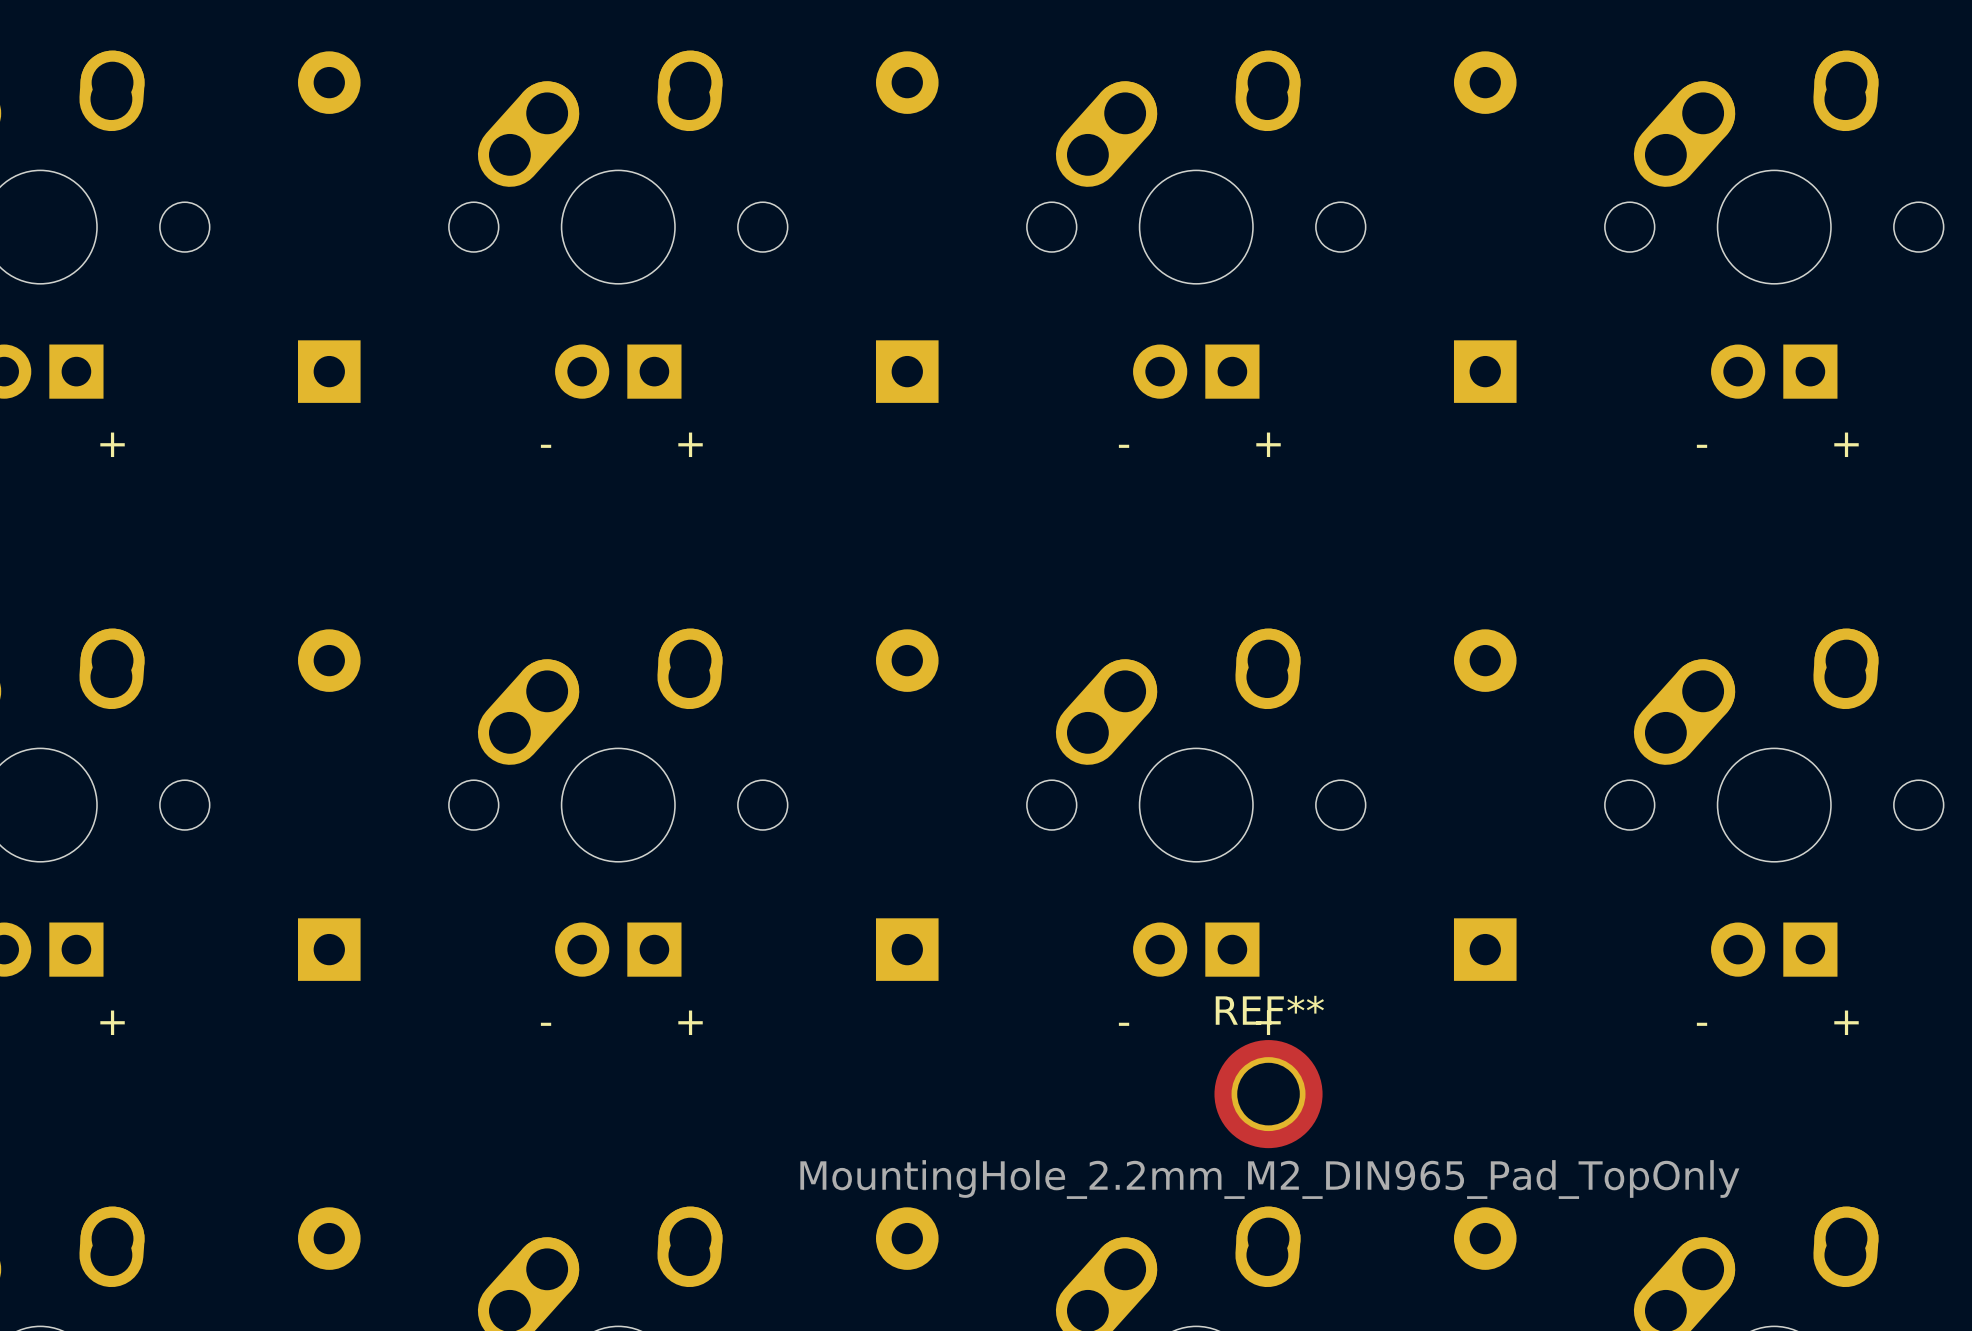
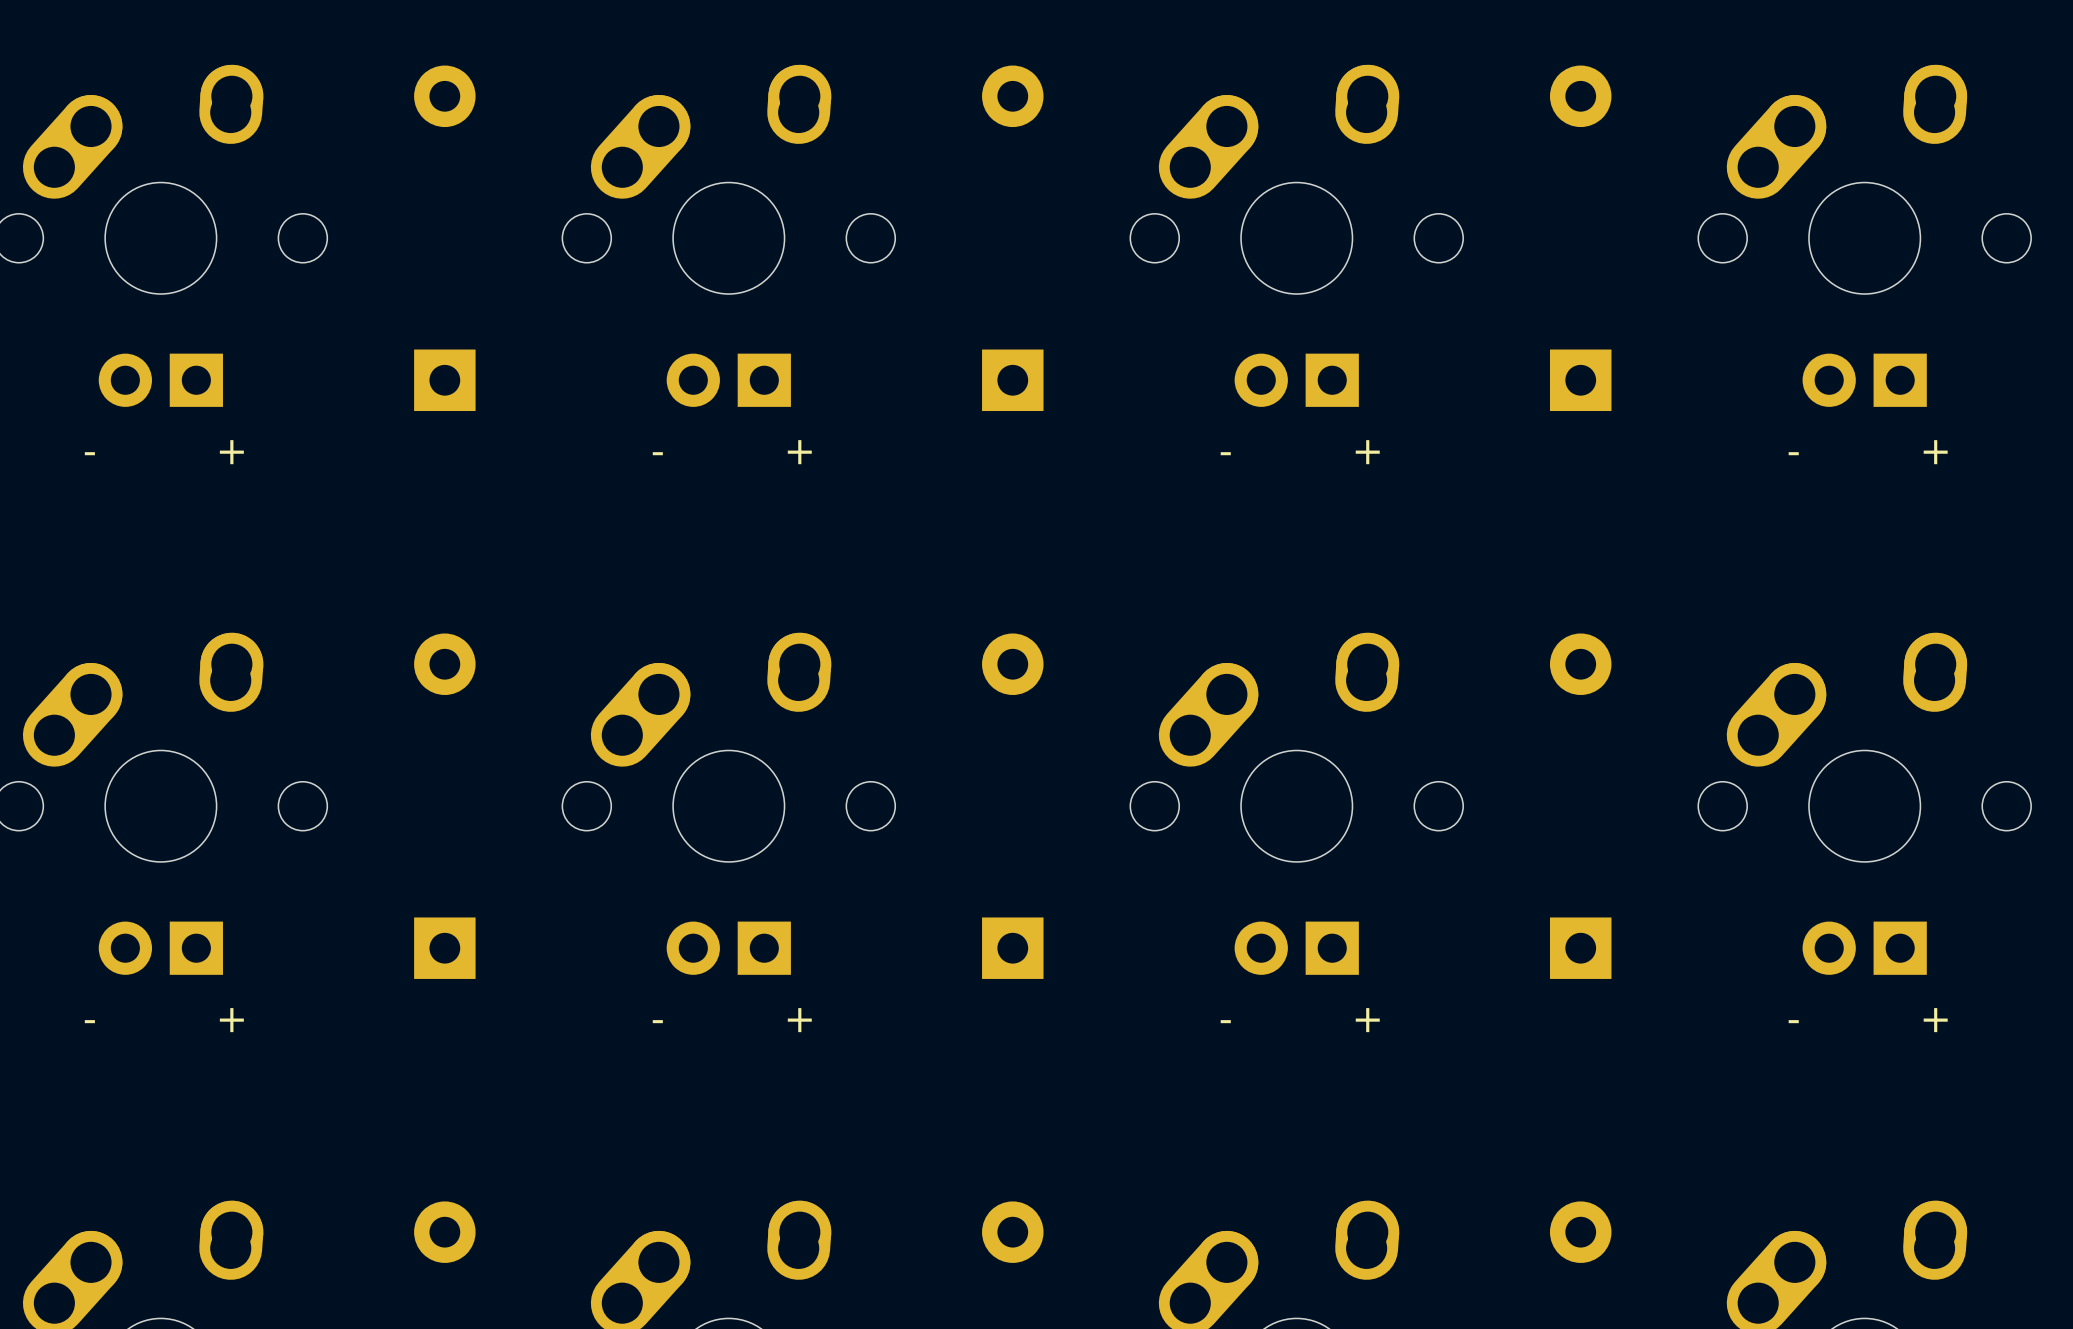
REF**: MountingHole_2.2mm_M2_DIN965_Pad_TopOnly (1268, 1094) -> none

